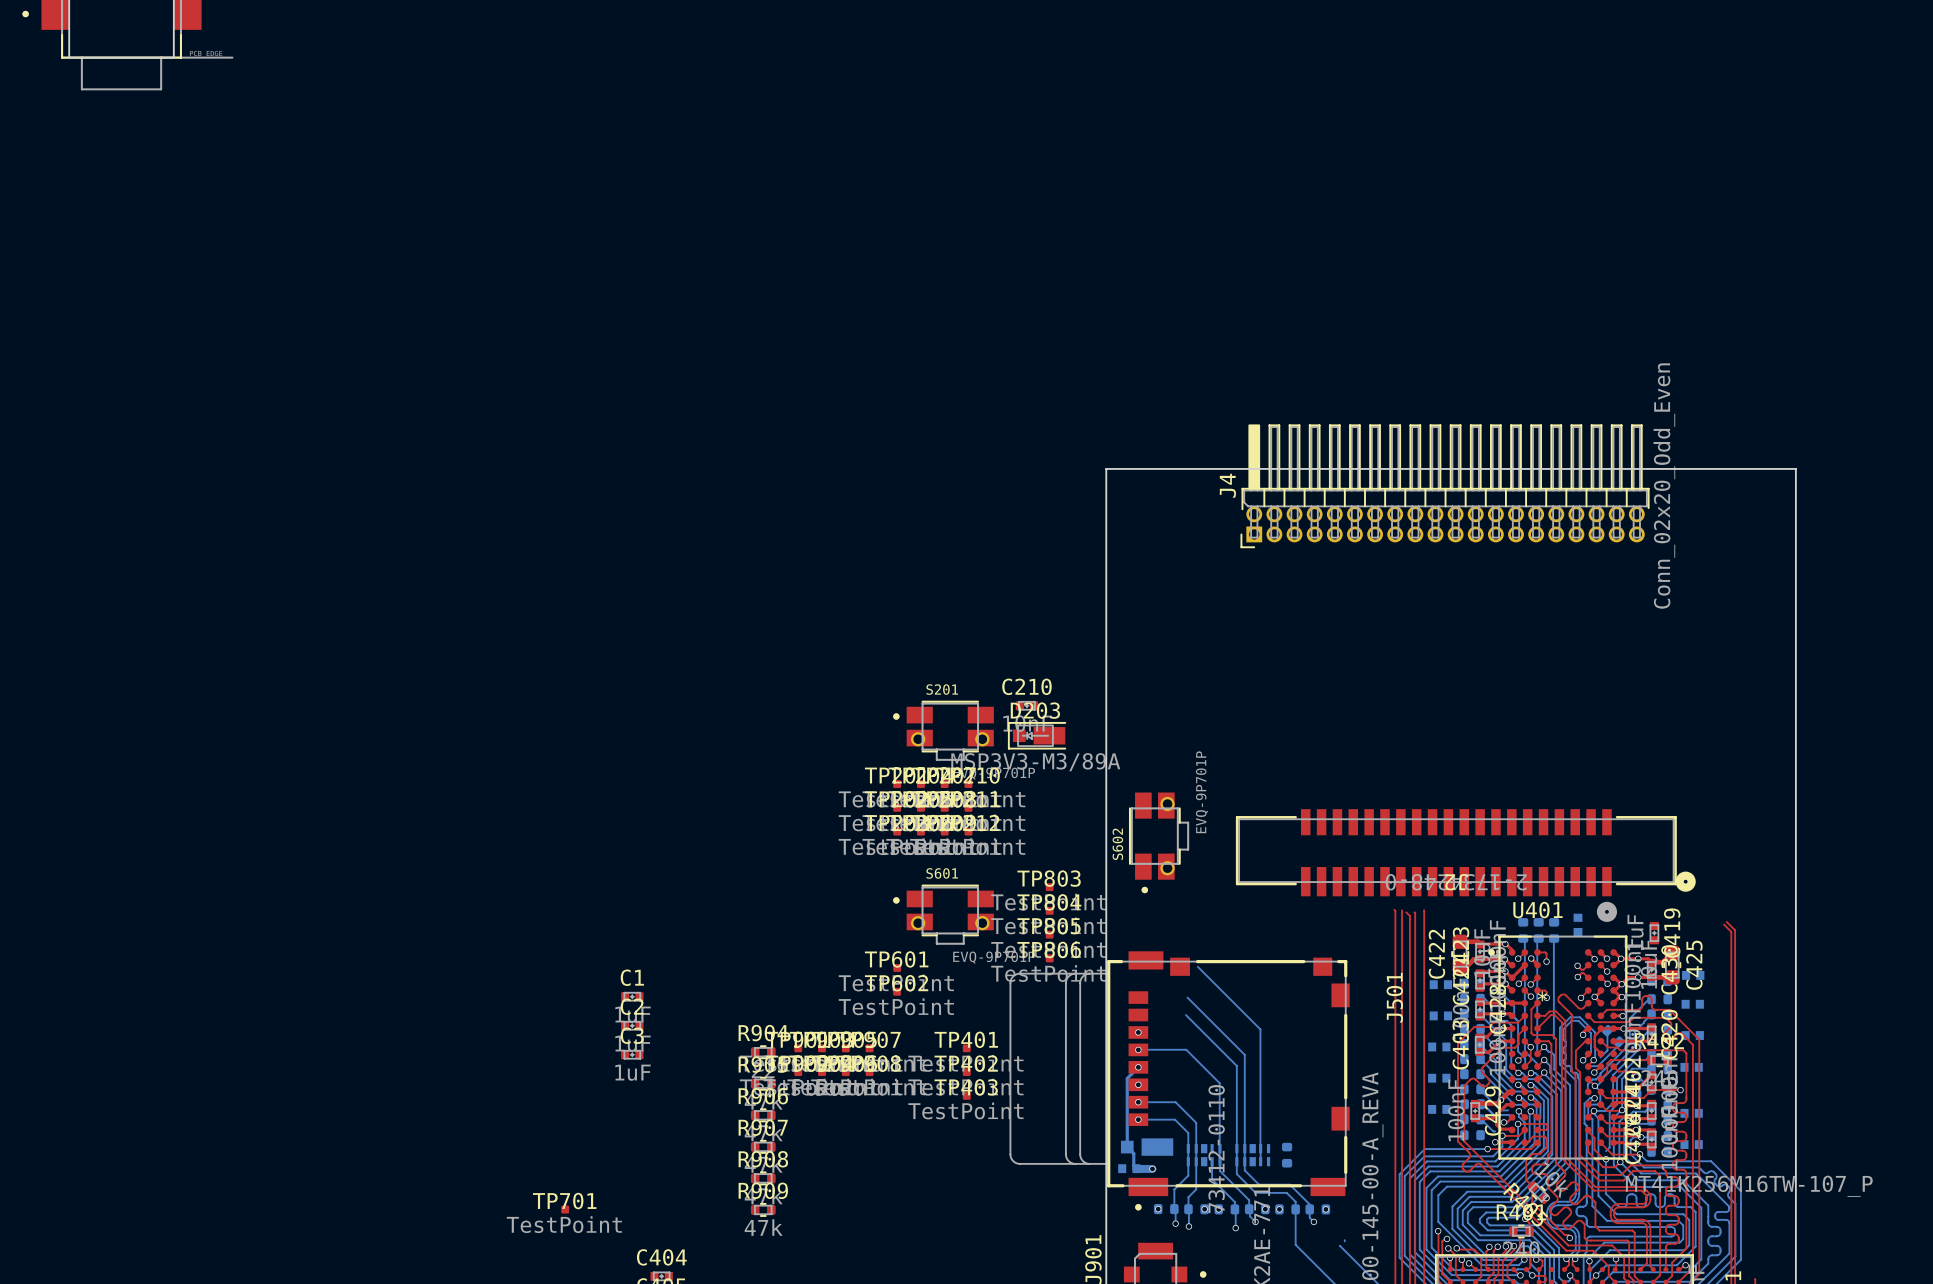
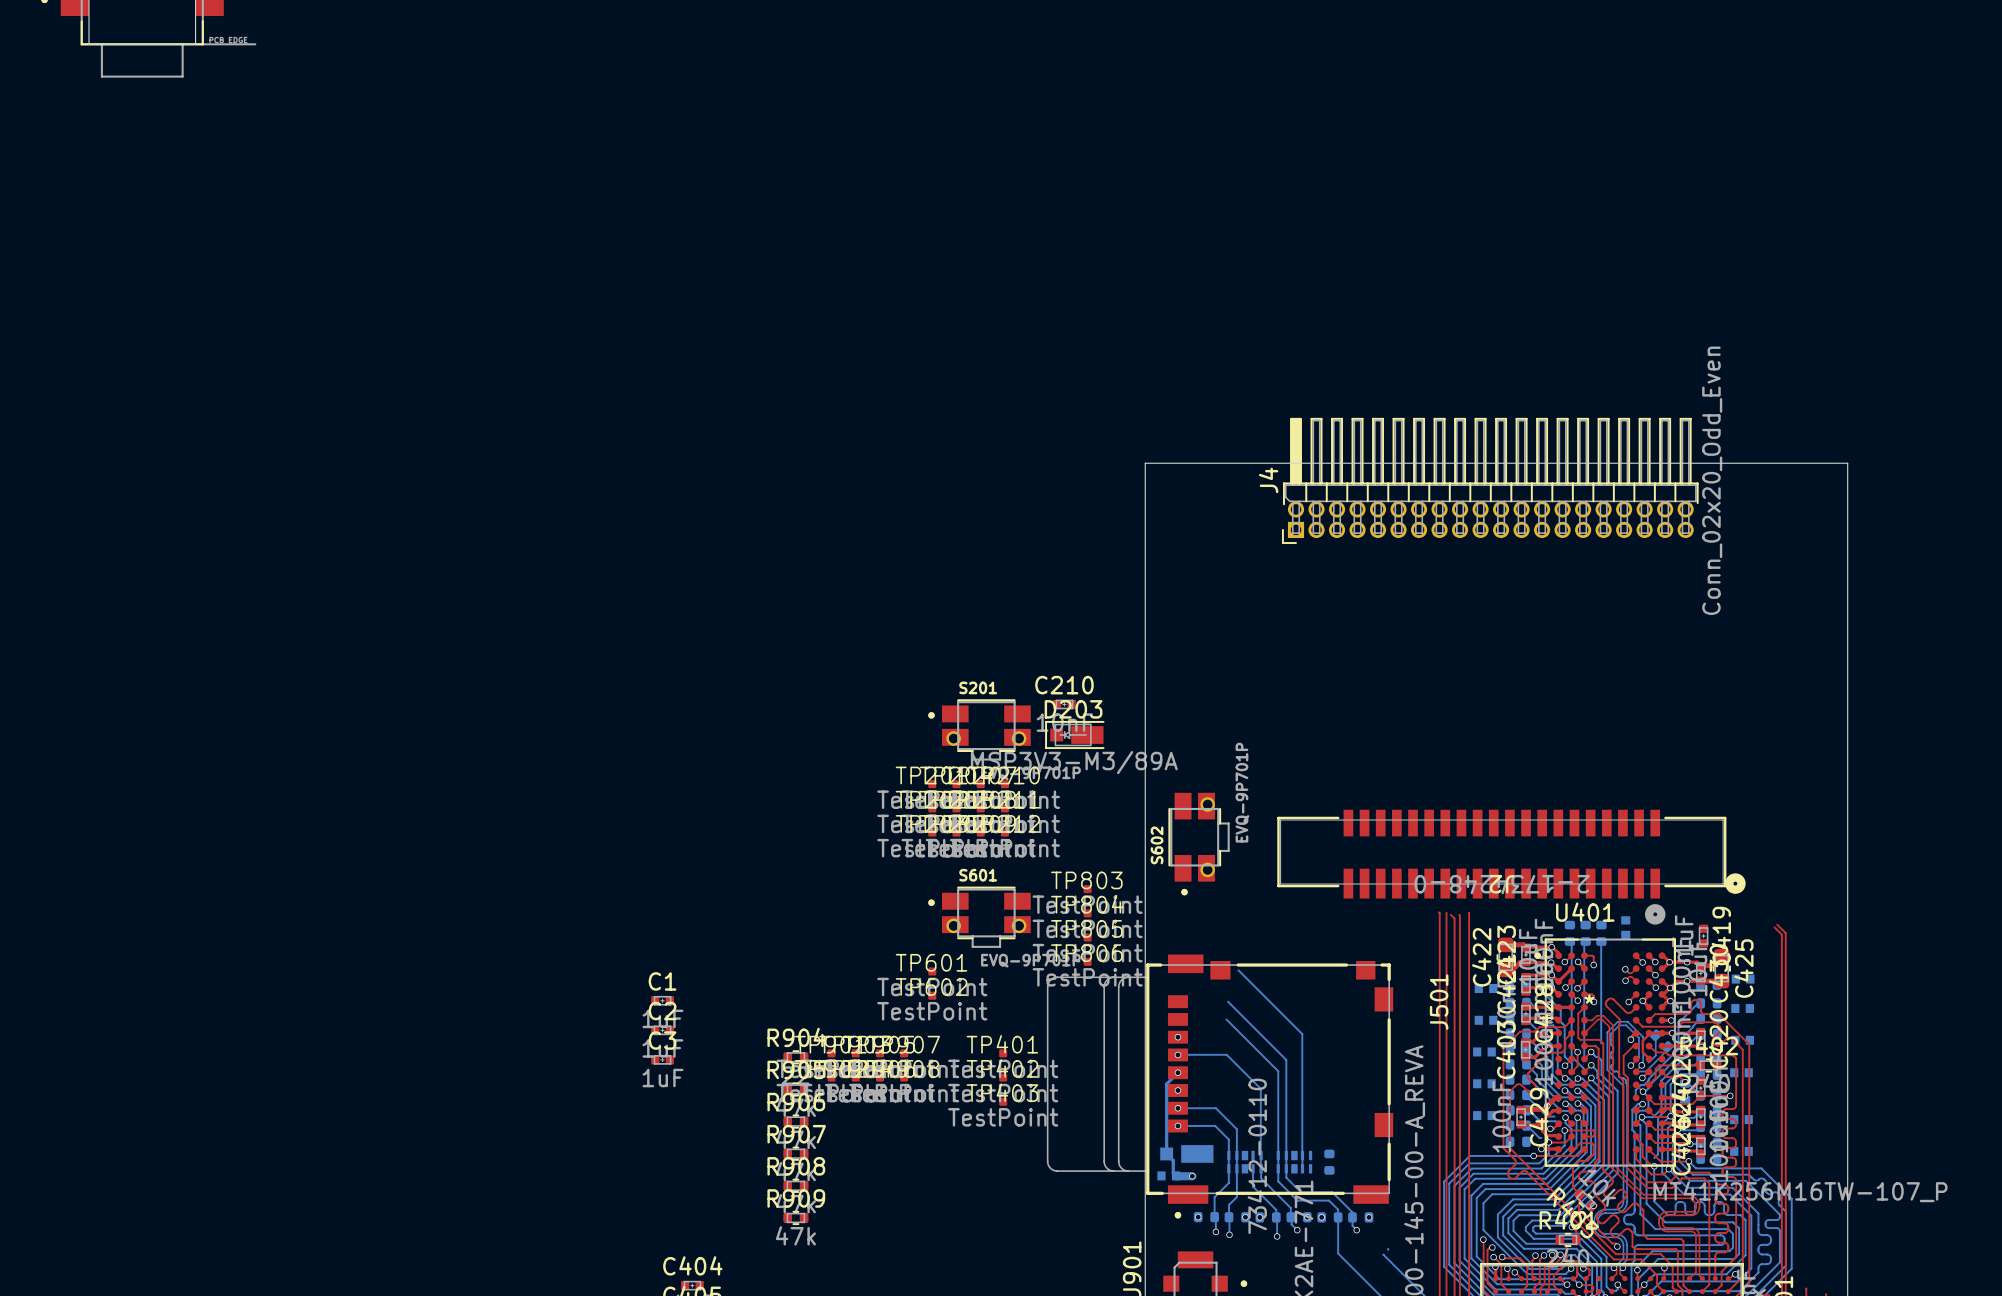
TP701: TestPoint (565, 1209) -> none

